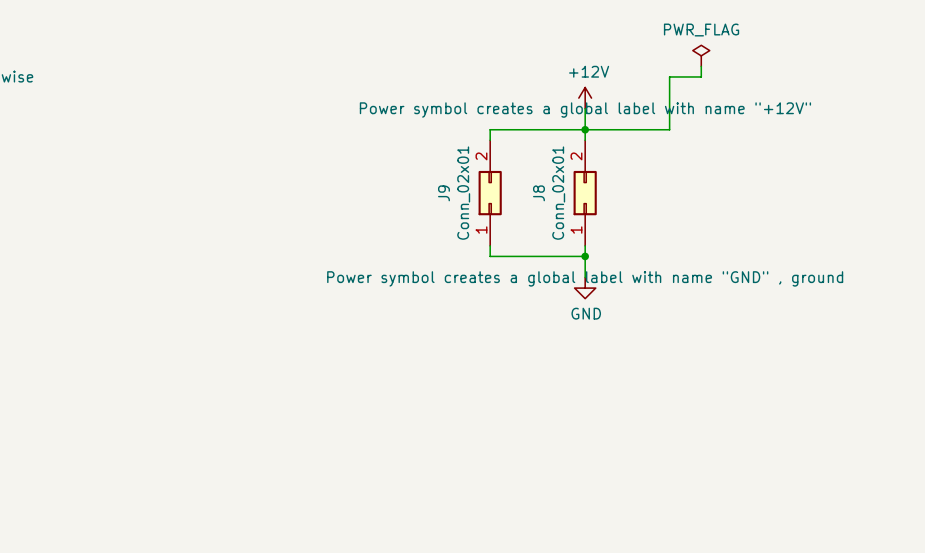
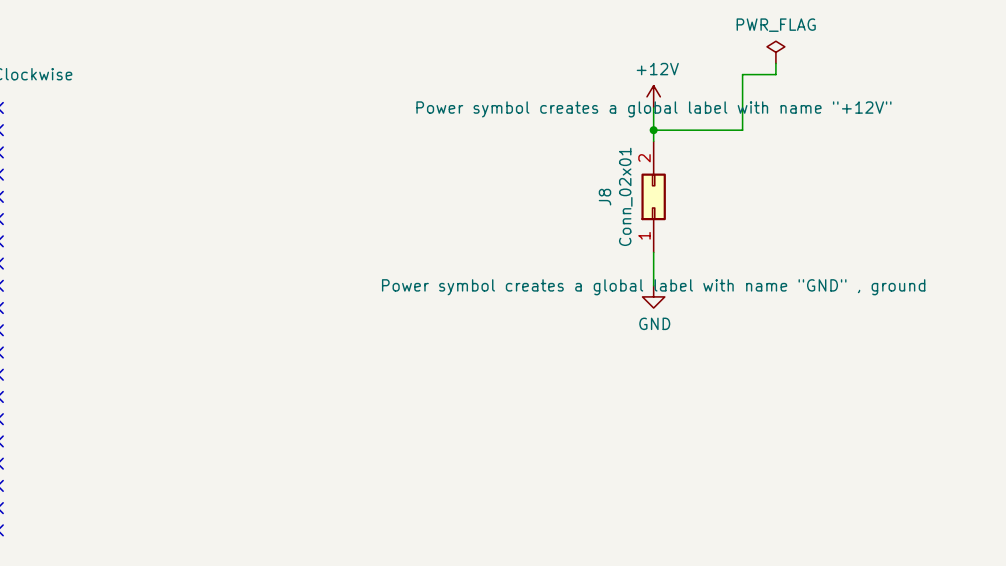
wire: (585, 129) (490, 129) (490, 140) -> none
J9: Conn_02x01 (490, 193) -> none
wire: (490, 245) (490, 256) (585, 256) -> none
junction: (585, 256) -> none

